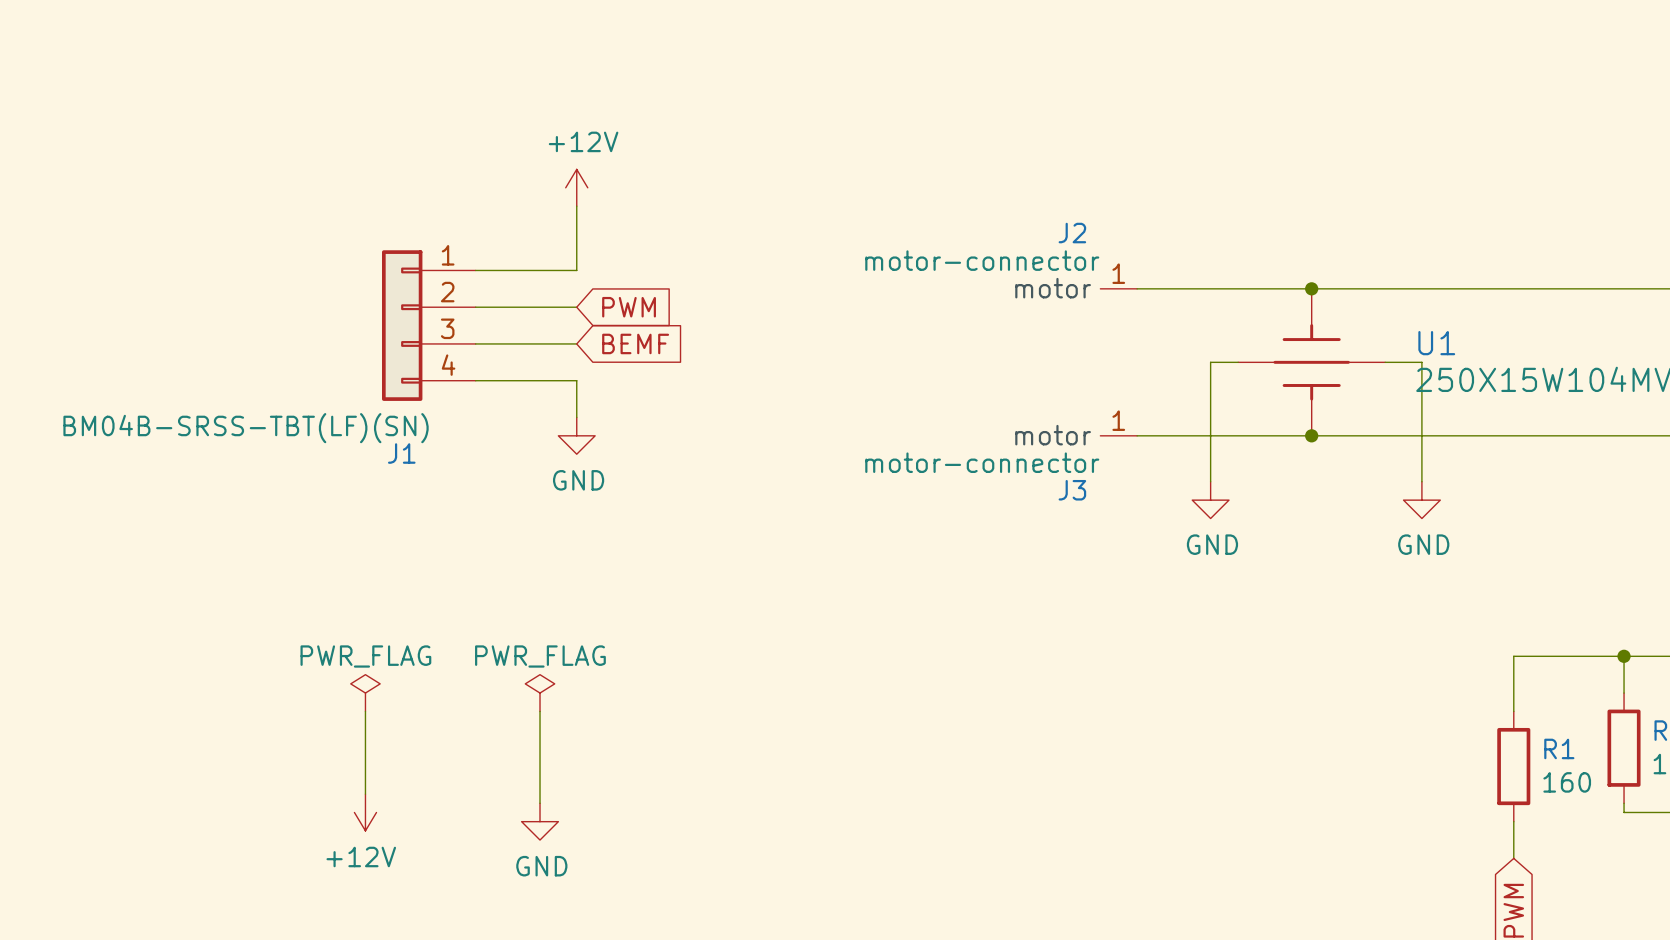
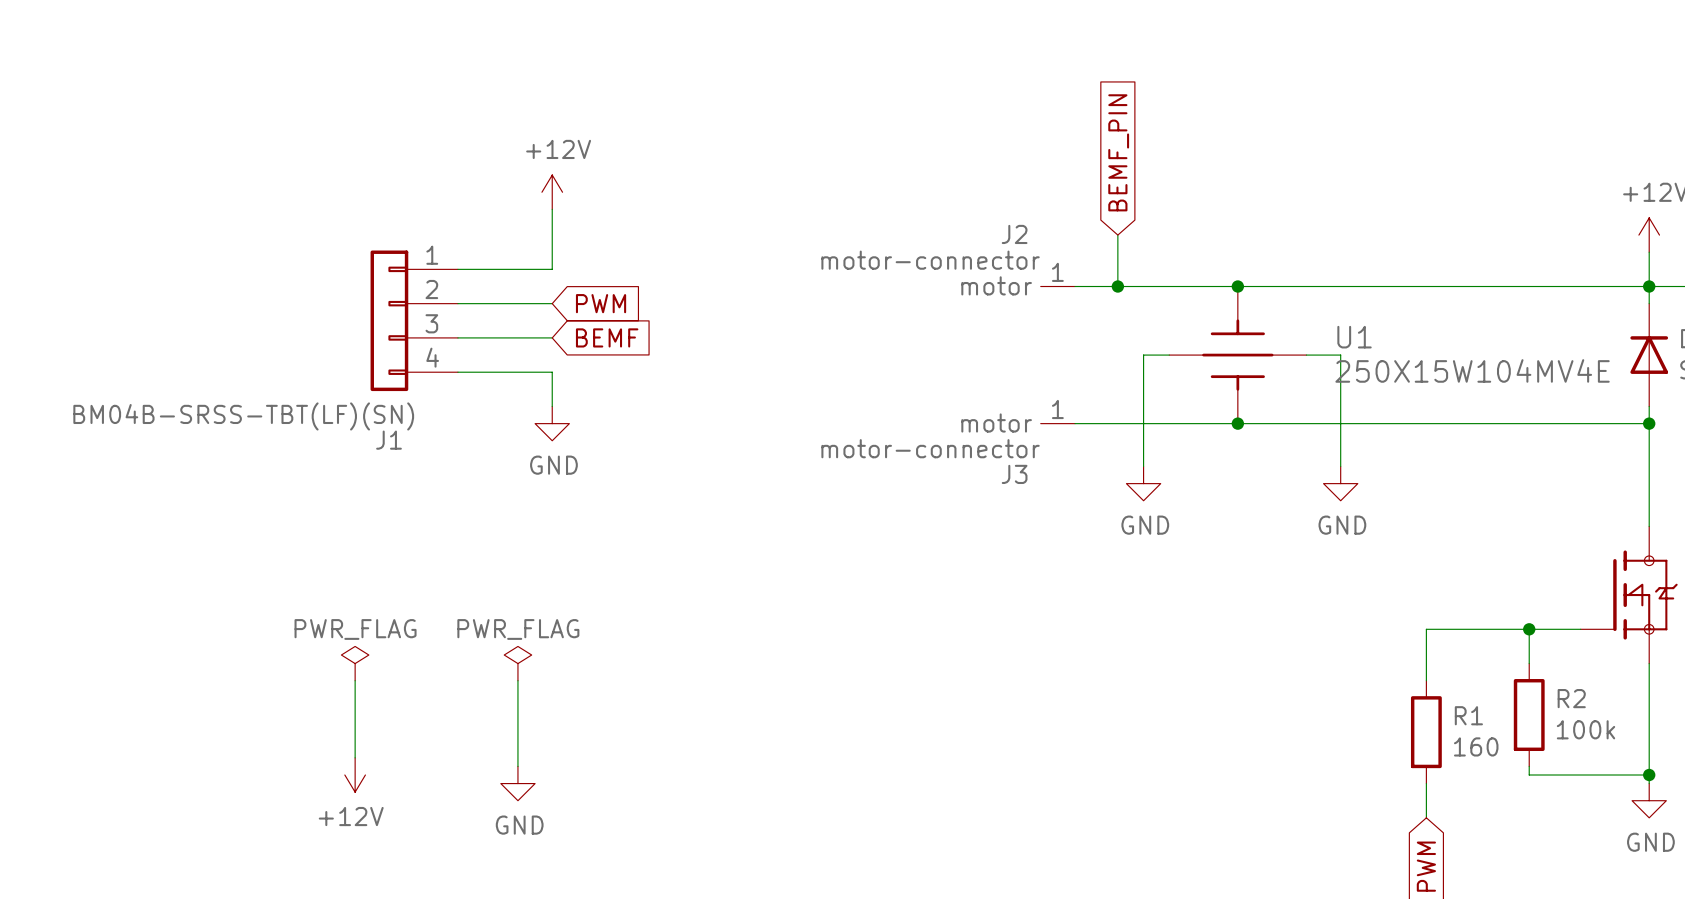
global label: none -> BEMF_PIN (1118, 152)
wire: none -> (1117, 235) (1117, 286)
junction: none -> (1117, 286)

